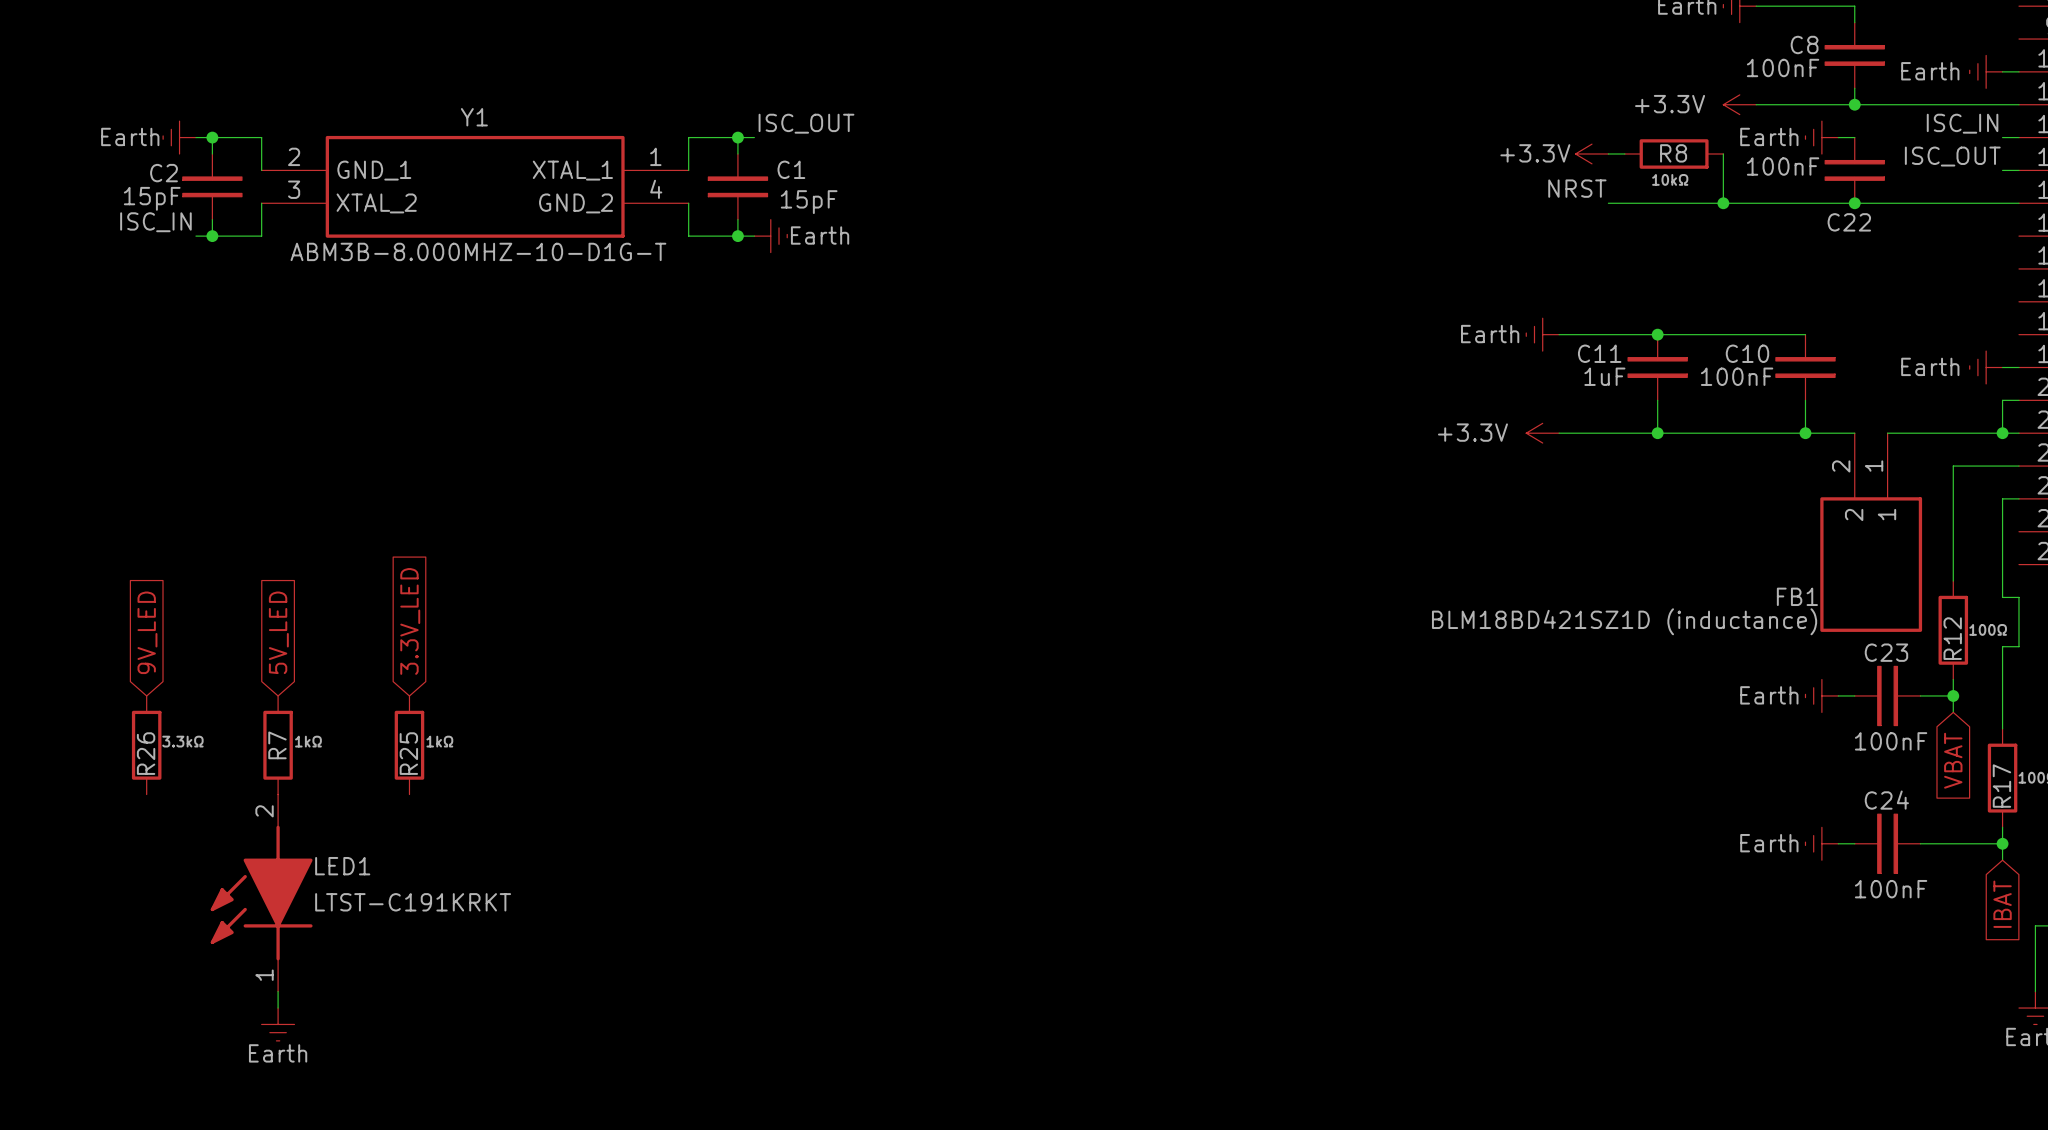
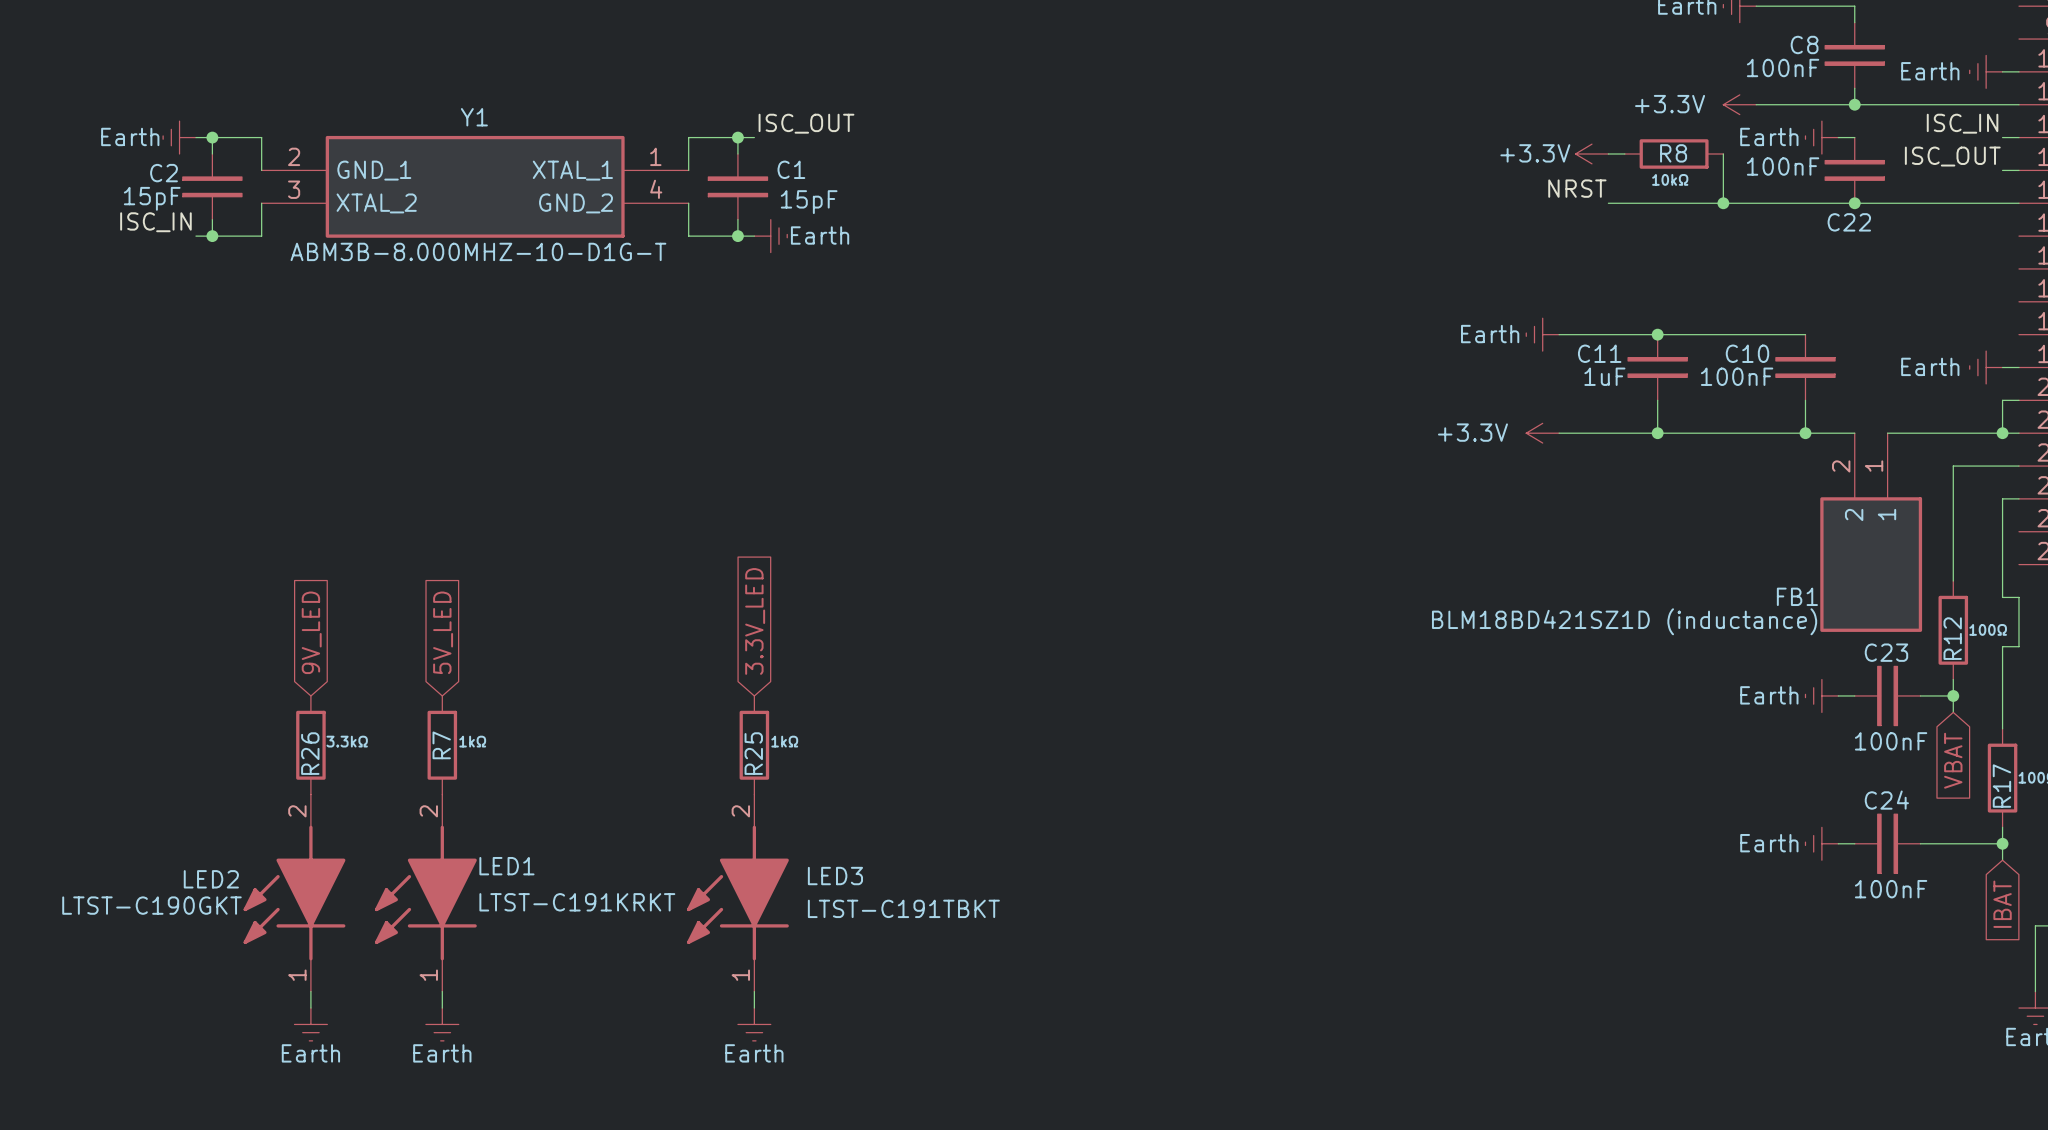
global label: 3.3V_LED (410, 621) -> none
global label: none -> 3.3V_LED (755, 621)
global label position: 9V_LED (147, 632) -> 9V_LED (311, 632)
global label position: 5V_LED (278, 632) -> 5V_LED (443, 632)
R26 position: (146, 745) -> (310, 745)
R7 position: (278, 745) -> (442, 745)
R25 position: (409, 745) -> (754, 745)
LED1 position: (261, 893) -> (425, 893)
LED2: none -> LTST-C190GKT (294, 893)
LED3: none -> LTST-C191TBKT (737, 893)
wire: (278, 991) (278, 1008) -> (310, 991) (310, 1008)
wire: none -> (442, 991) (442, 1008)
wire: none -> (754, 991) (754, 1008)
power symbol position: Earth (278, 1024) -> Earth (310, 1024)
power symbol: none -> Earth (442, 1024)
power symbol: none -> Earth (754, 1024)

